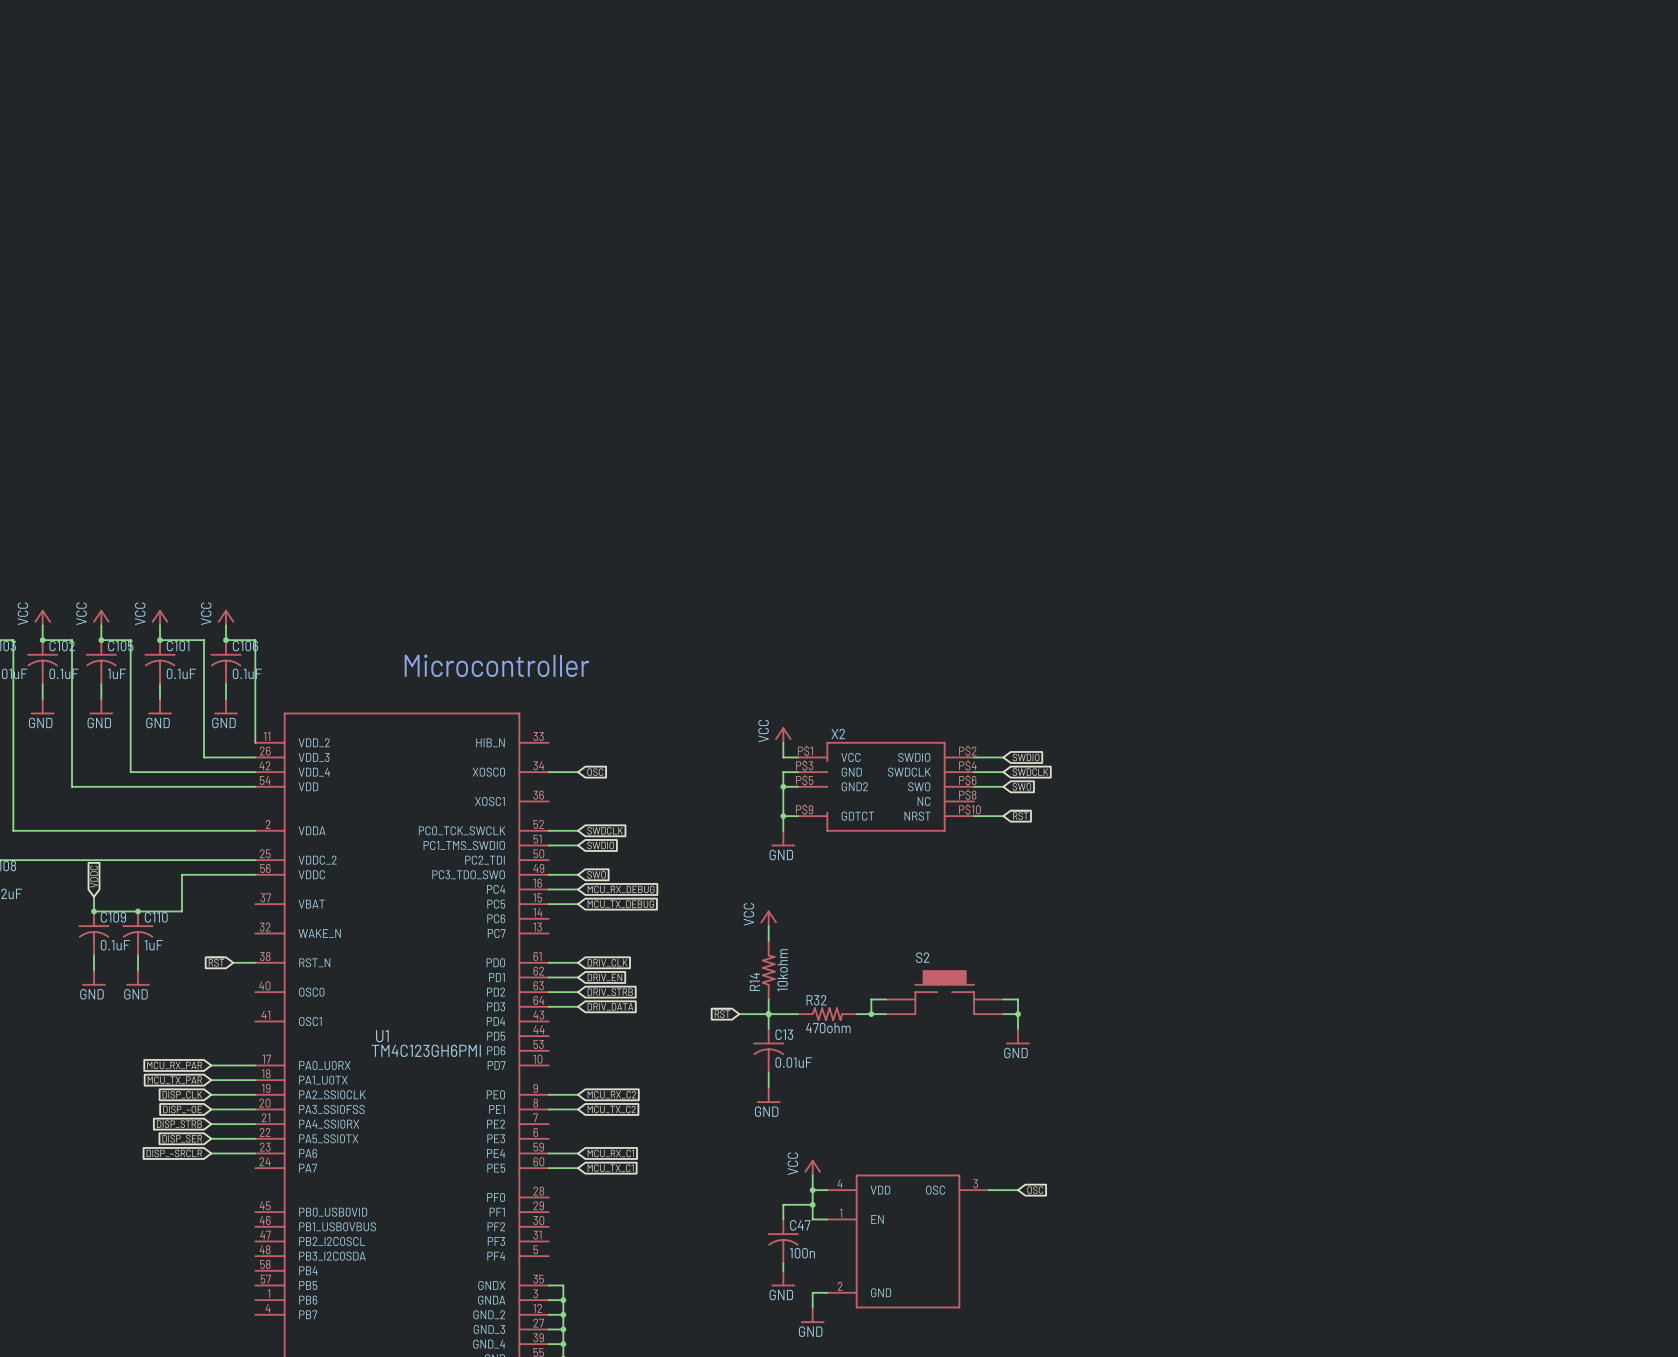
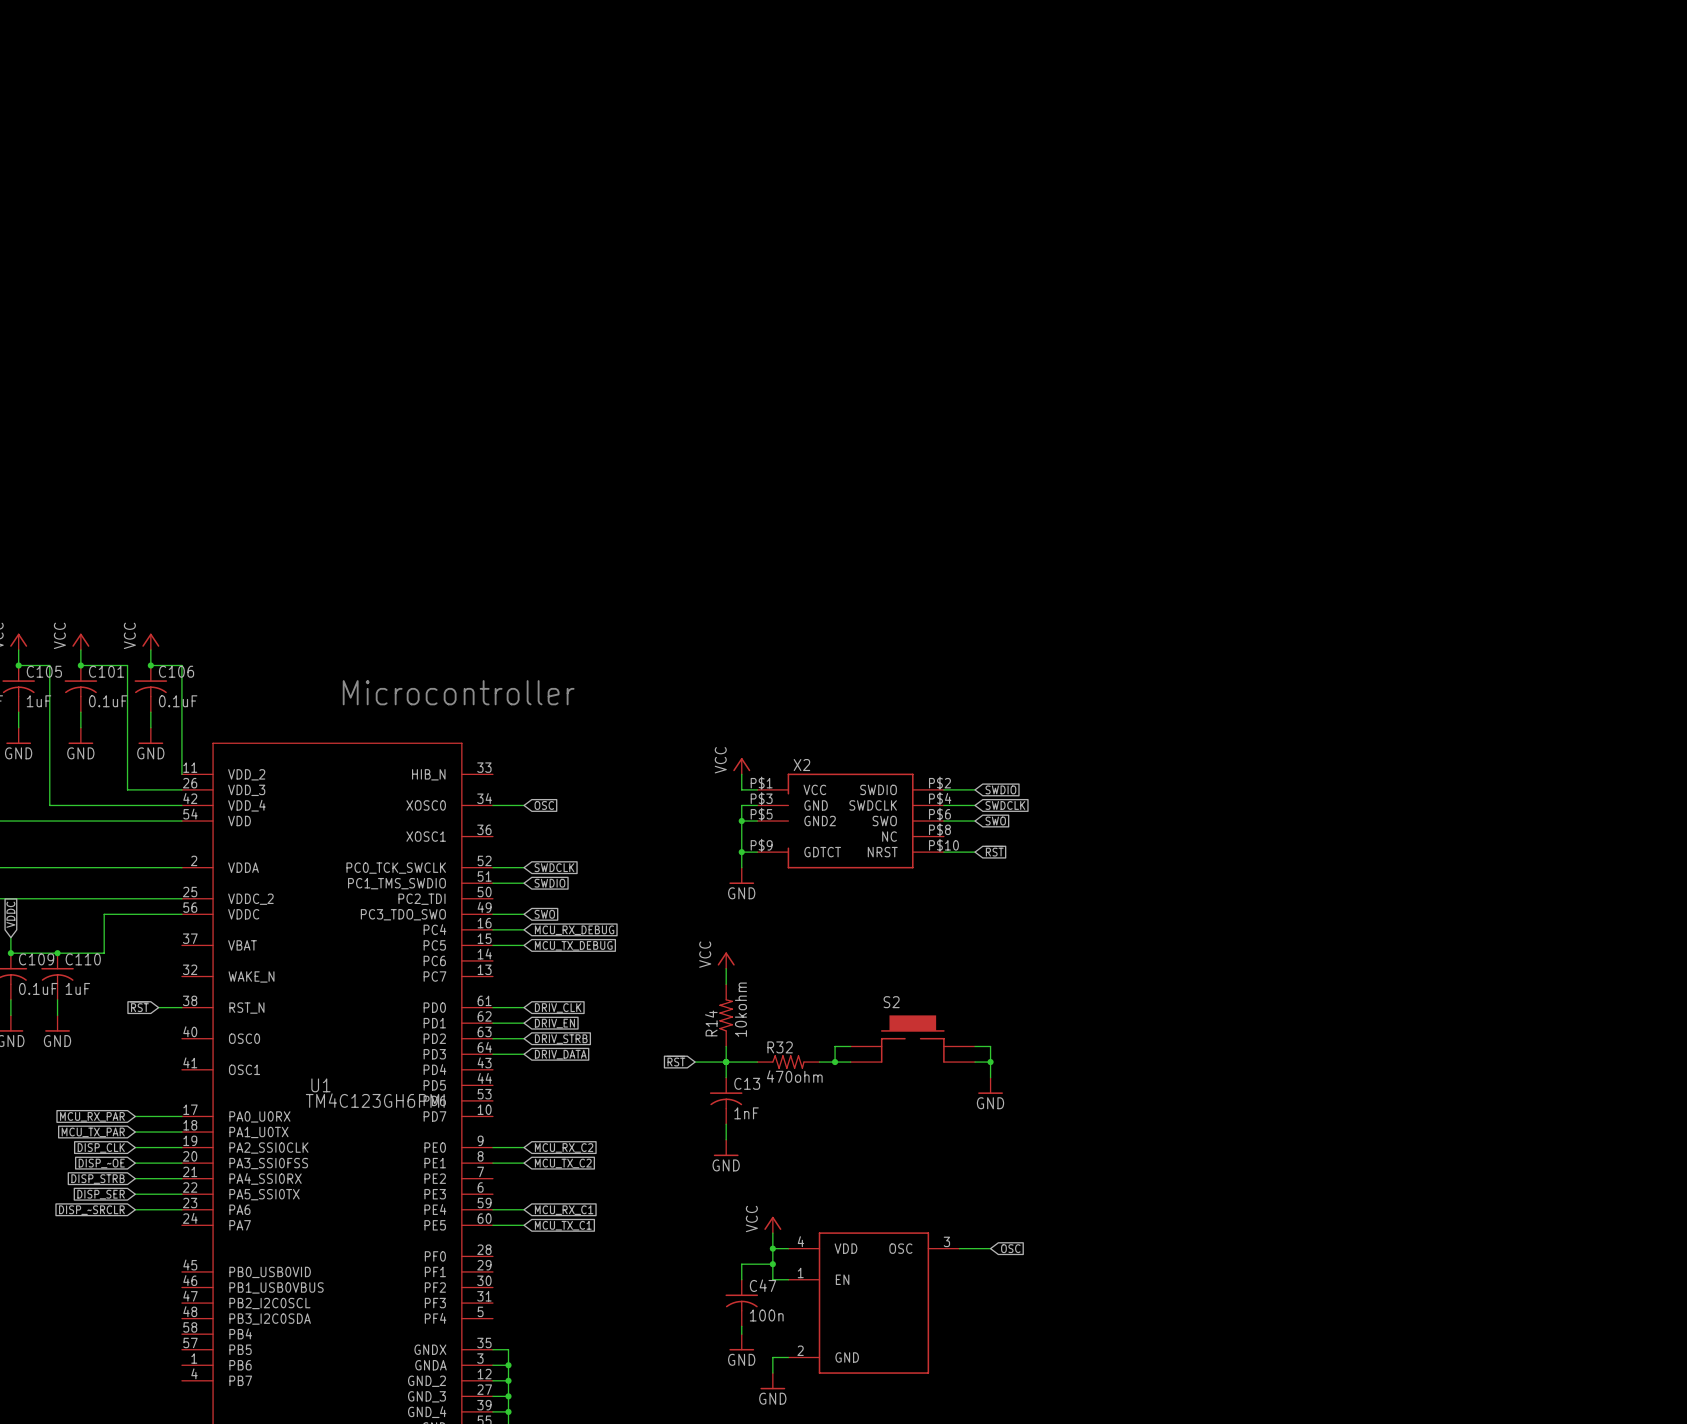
C13 value: 0.01uF (793, 1062) -> 1nF (746, 1113)

